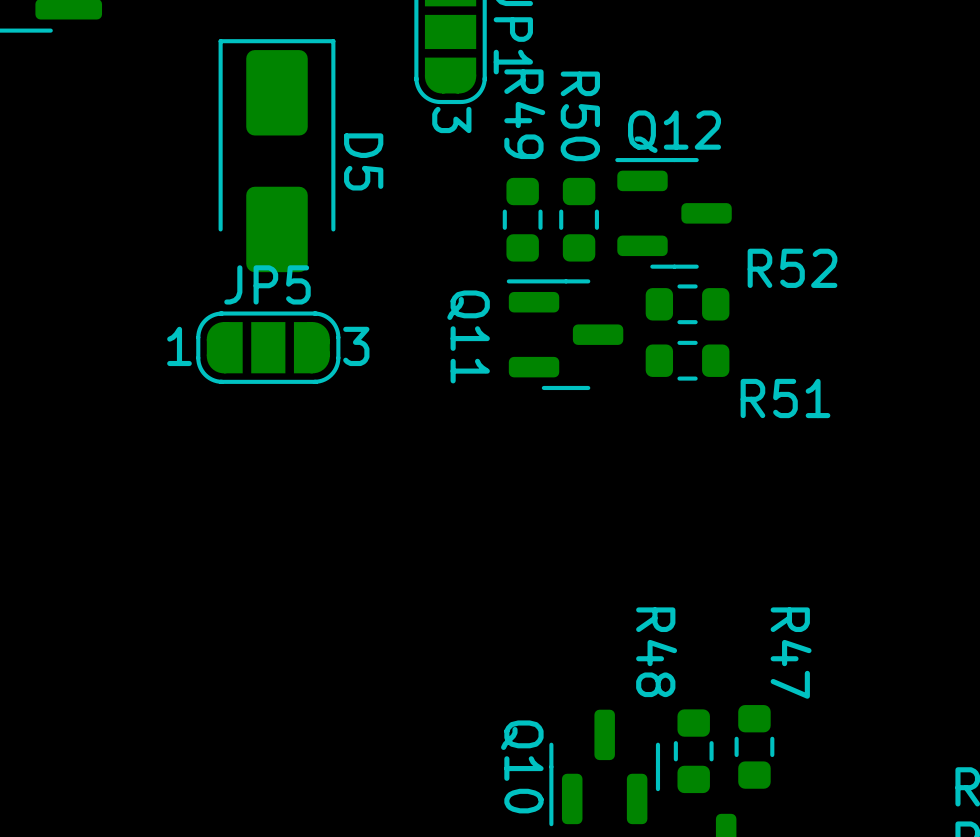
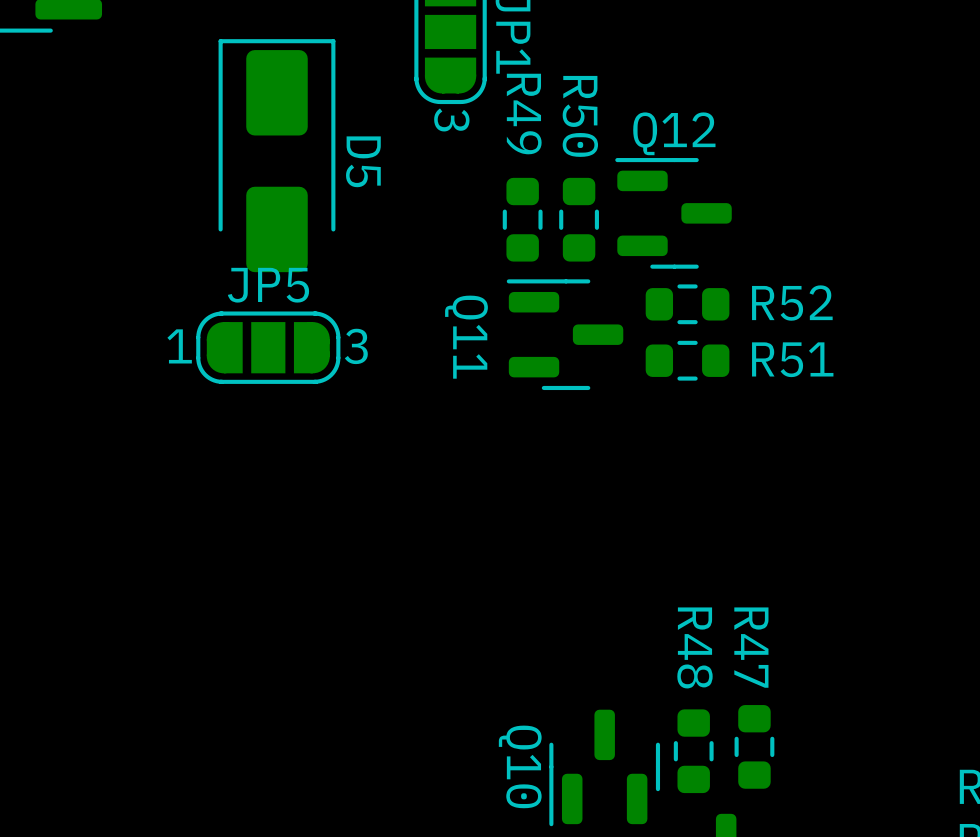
R52 name position: R52 (792, 268) -> R52 (792, 303)
R51 name position: R51 (785, 398) -> R51 (792, 359)
R48 name position: R48 (656, 652) -> R48 (694, 647)
R47 name position: R47 (791, 653) -> R47 (751, 647)

